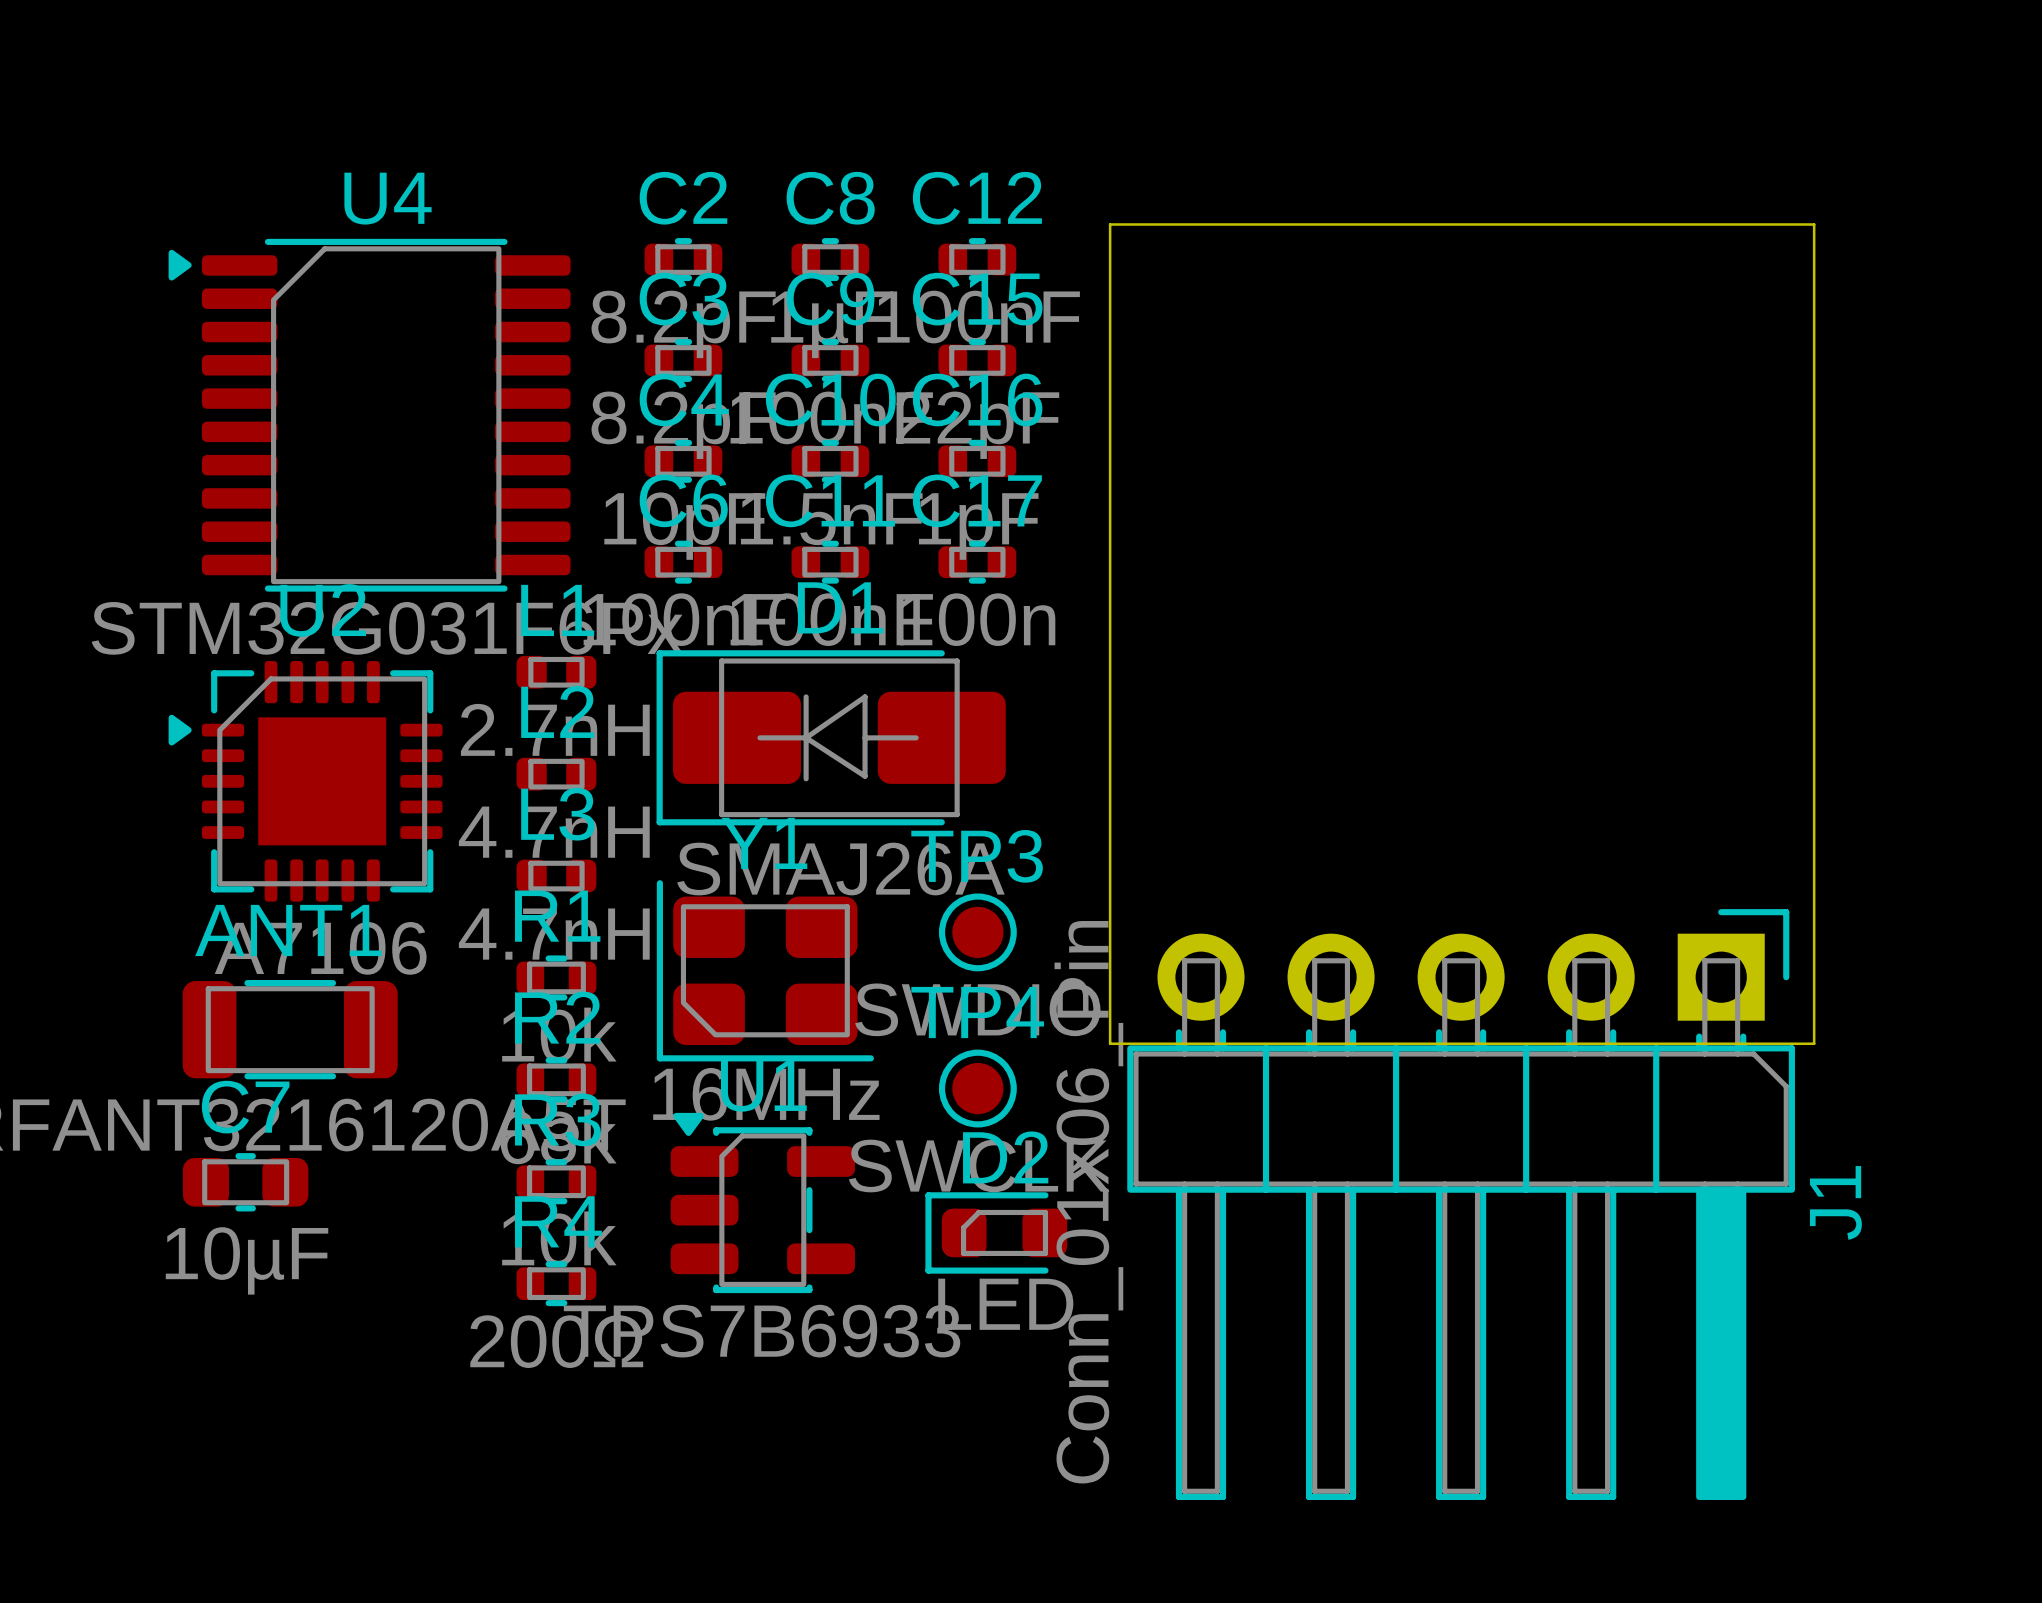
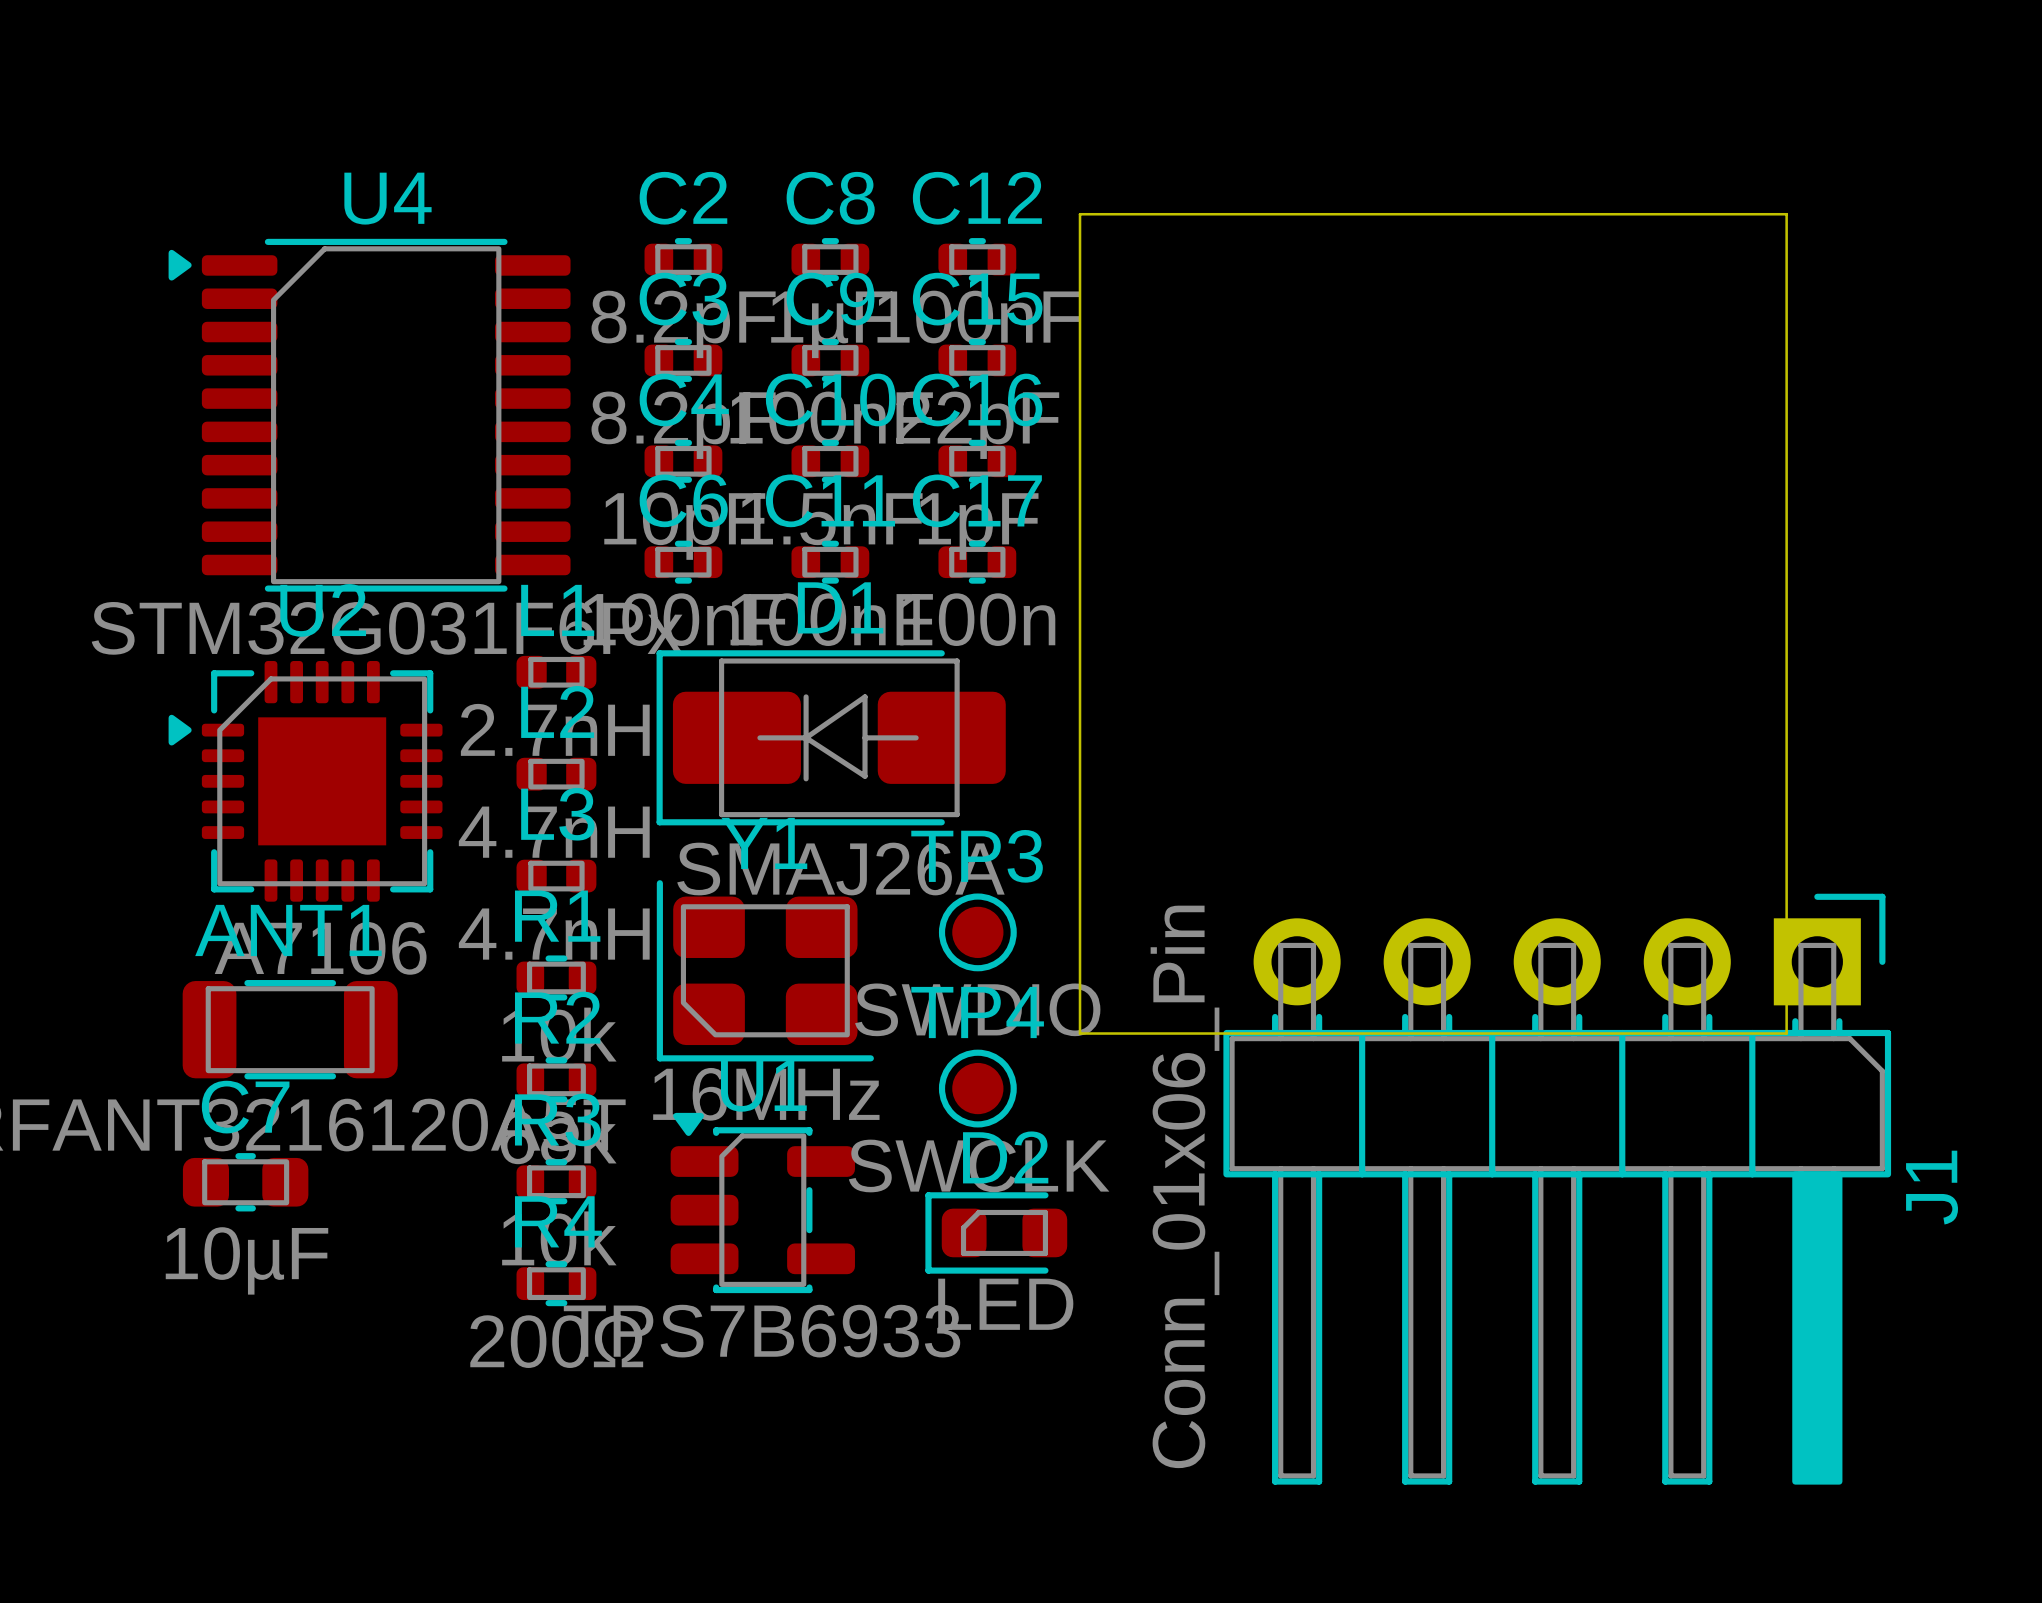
board edge: (1110, 224) (1814, 224) (1814, 1043) (1110, 1043) (1110, 224) -> (1080, 214) (1080, 1033) (1786, 1033) (1786, 214) (1080, 214)
J1 position: (1461, 1204) -> (1557, 1189)

